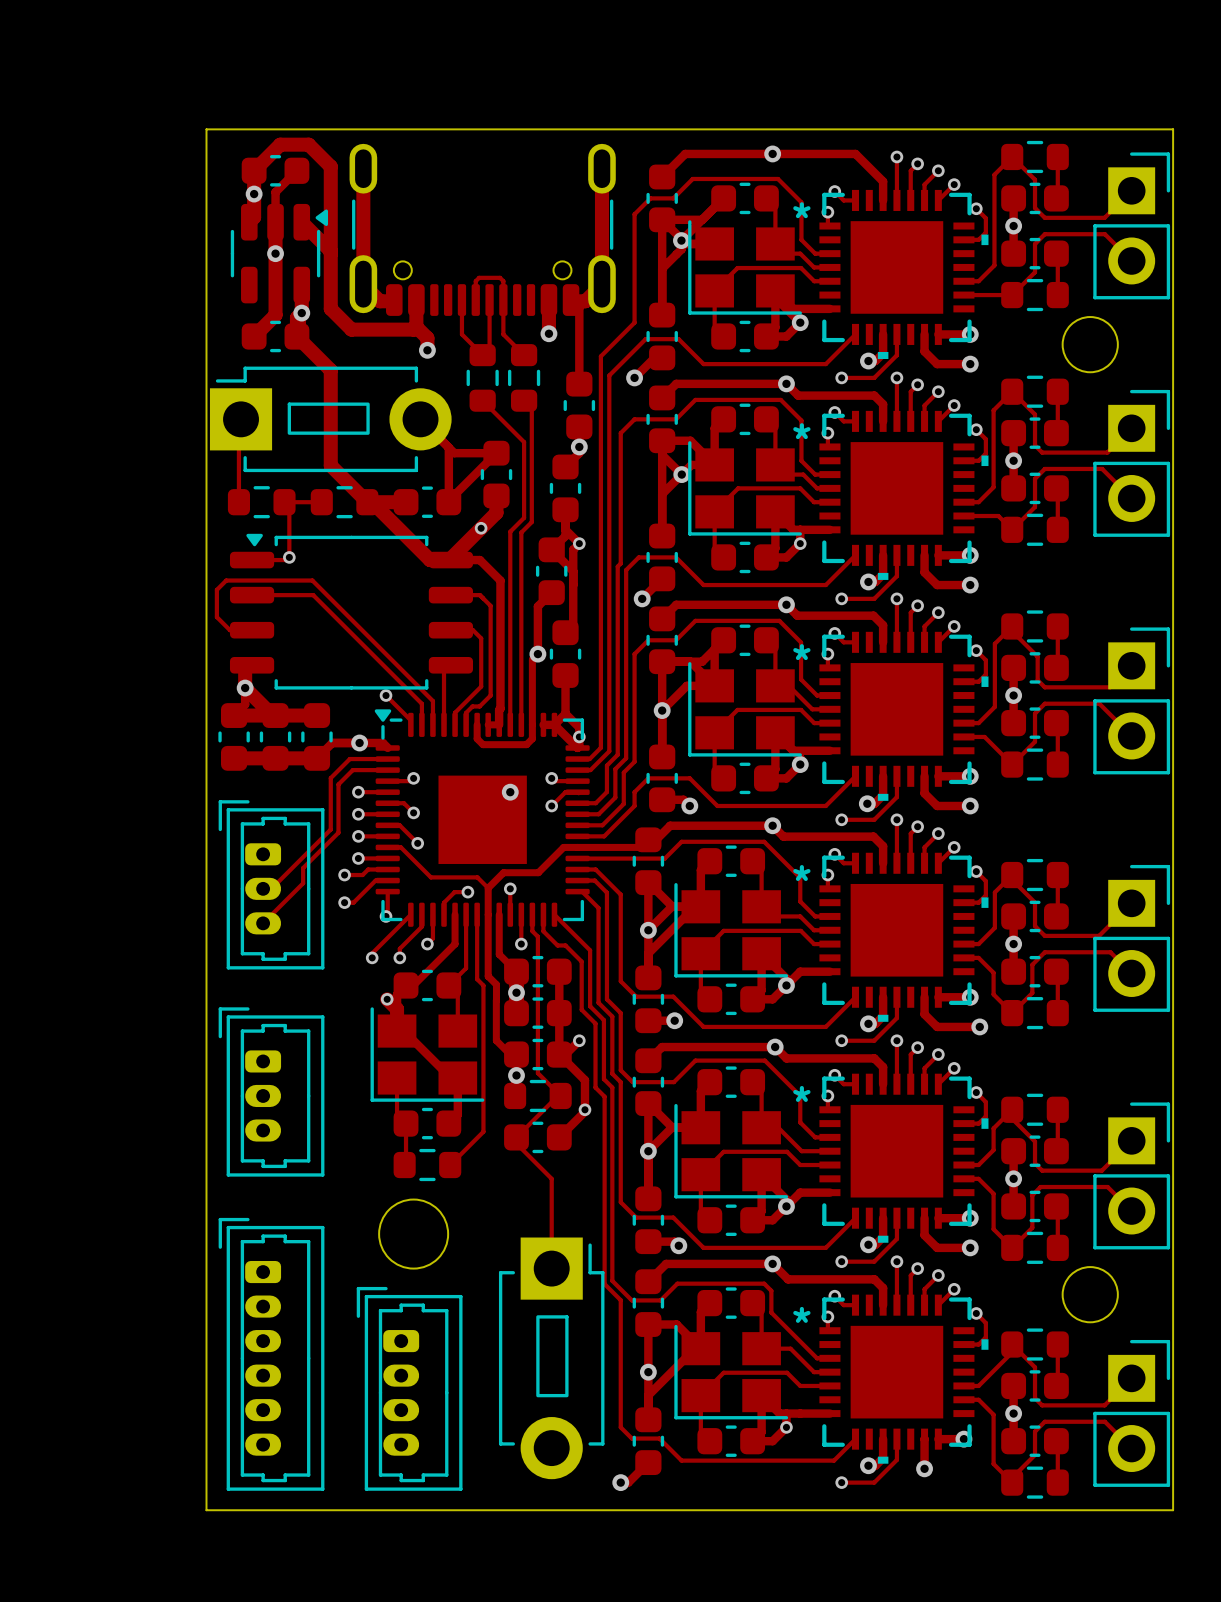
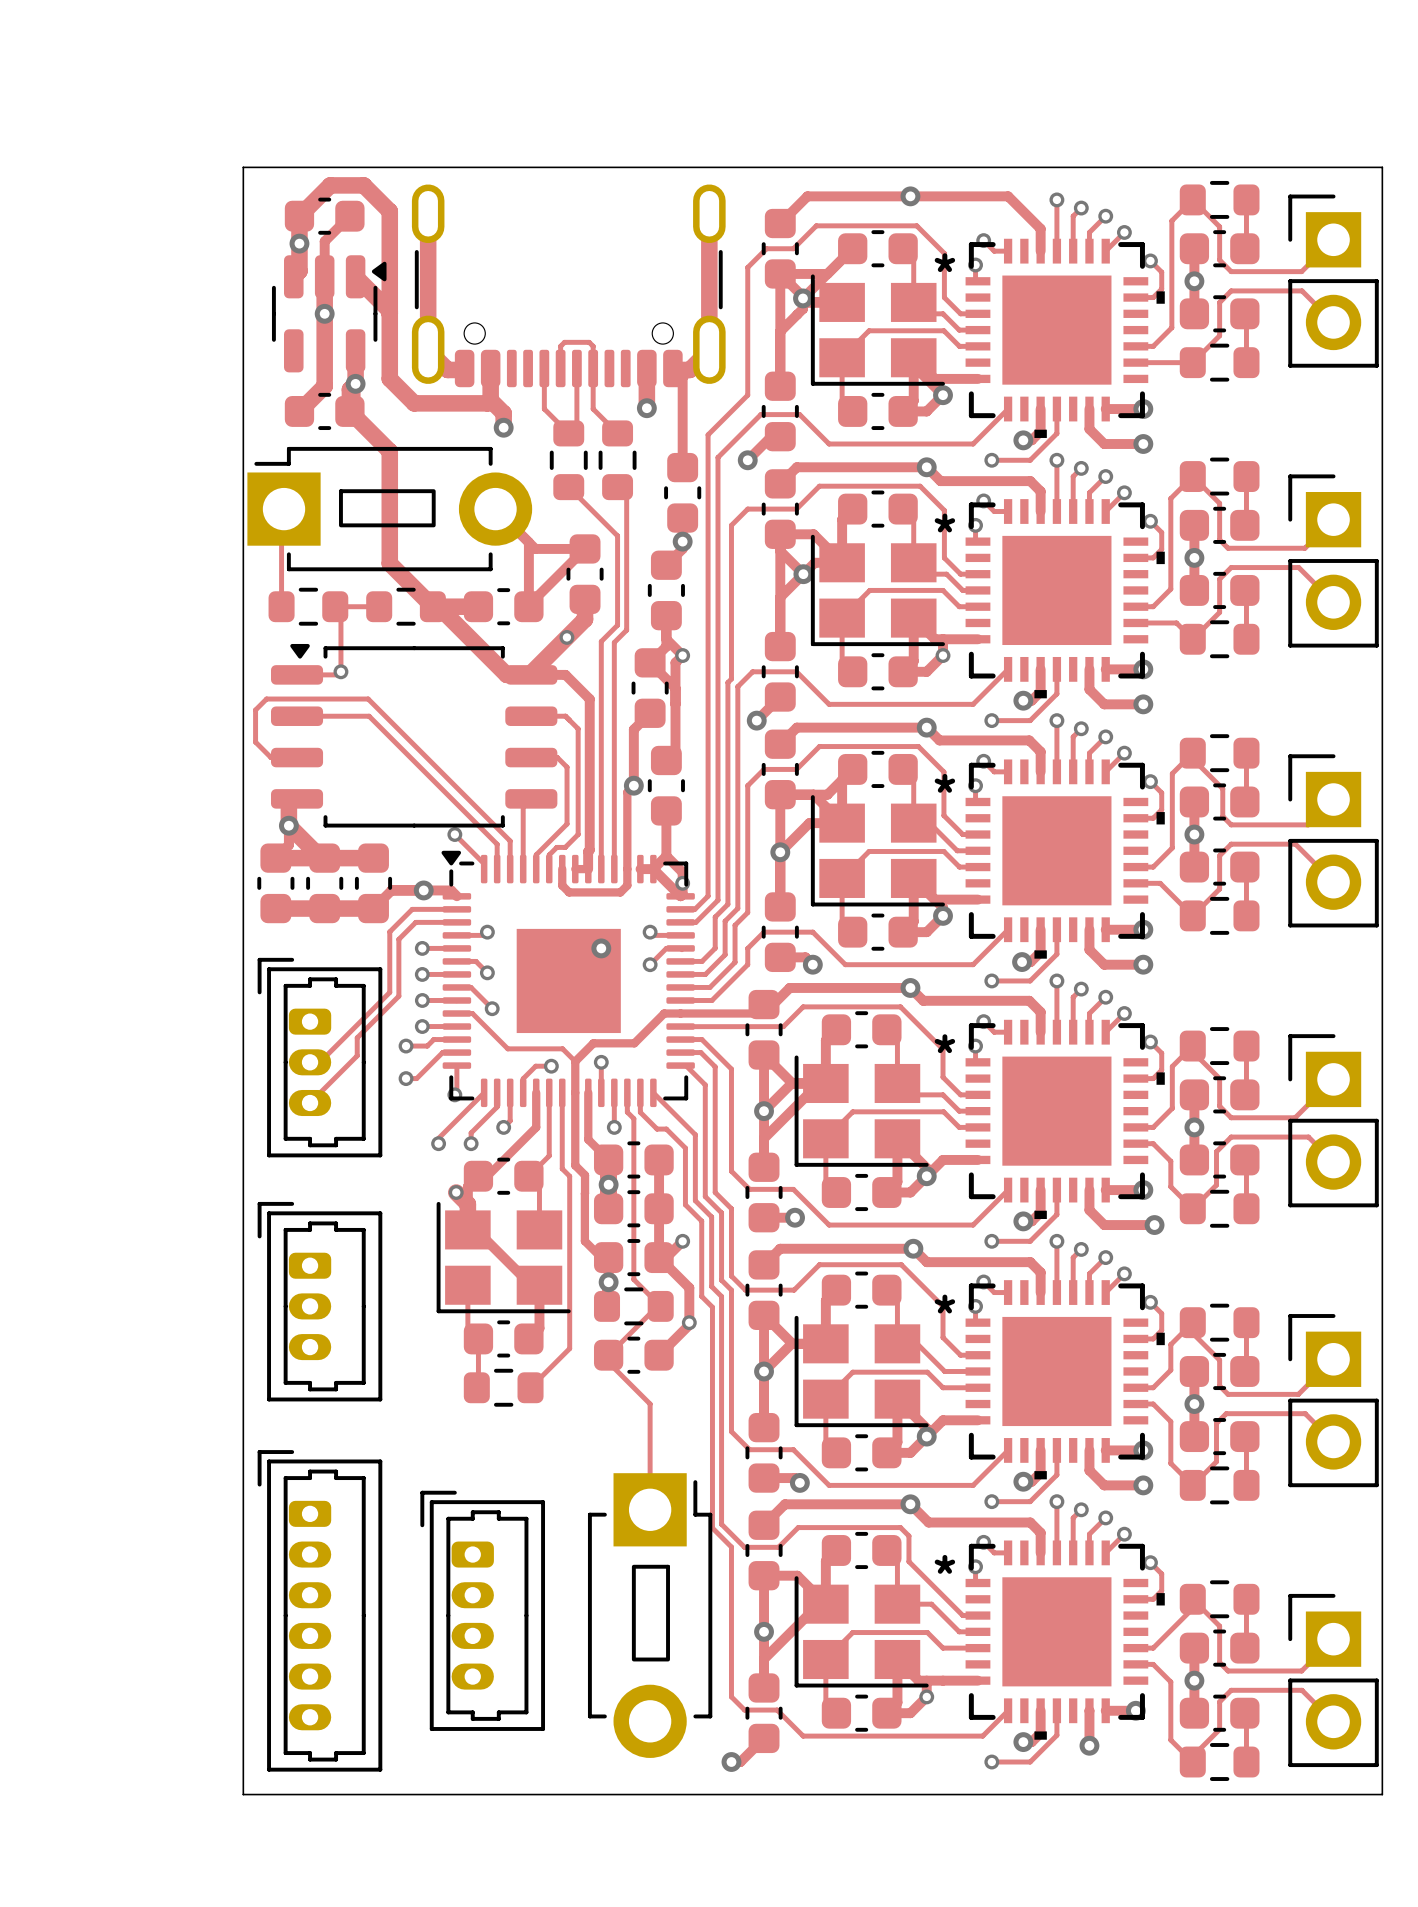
part footprint: [1093, 152, 1171, 300] -> [1288, 194, 1379, 368]
round board edge: [1061, 316, 1119, 373] -> none
part footprint: [1093, 389, 1171, 537] -> [1288, 474, 1379, 648]
part footprint: [1093, 627, 1171, 775] -> [1288, 754, 1379, 928]
part footprint: [1093, 864, 1171, 1012] -> [1288, 1034, 1379, 1208]
part footprint: [1093, 1102, 1171, 1250] -> [1288, 1314, 1379, 1488]
round board edge: [378, 1198, 449, 1270] -> none
round board edge: [1061, 1266, 1119, 1323] -> none
part footprint: [1093, 1339, 1171, 1487] -> [1288, 1593, 1379, 1768]
part position: (409, 1388) -> (482, 1610)

